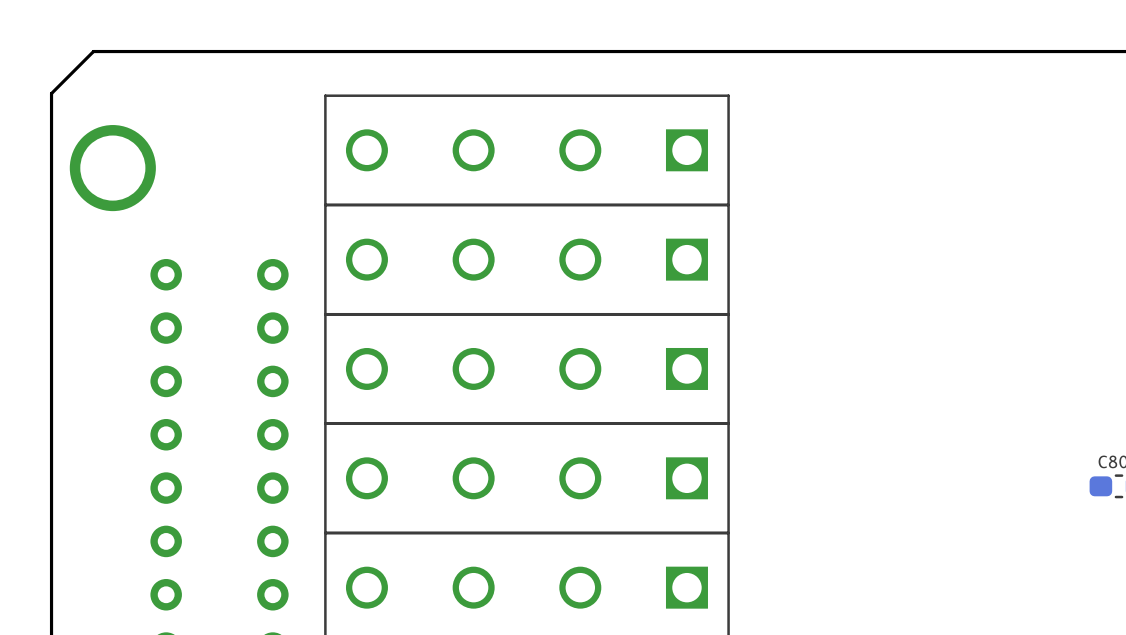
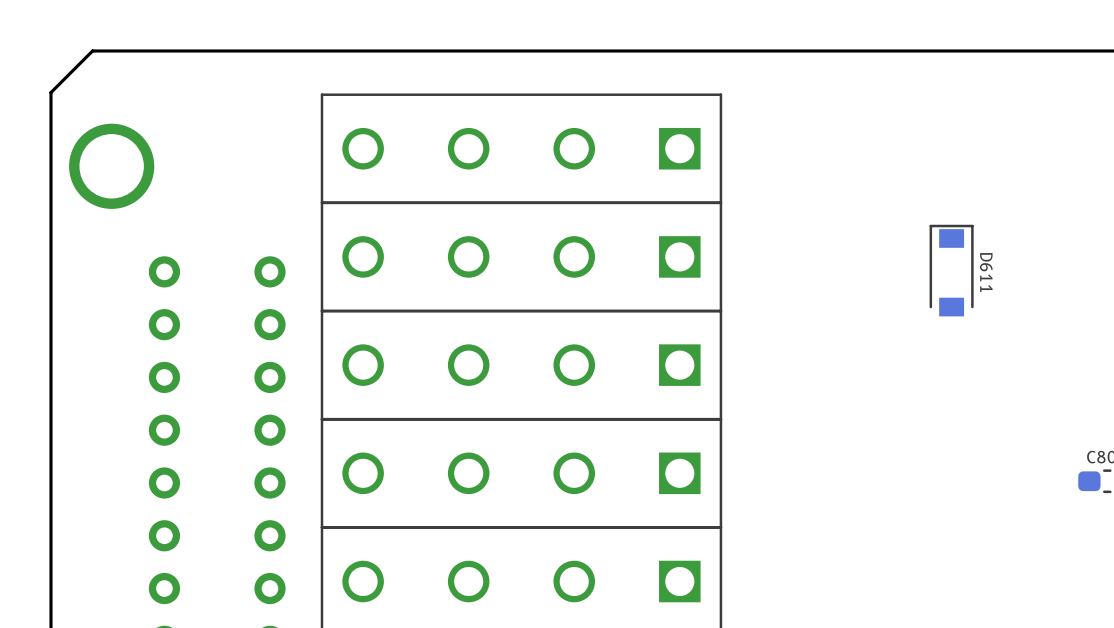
D611: none -> (951, 270)

